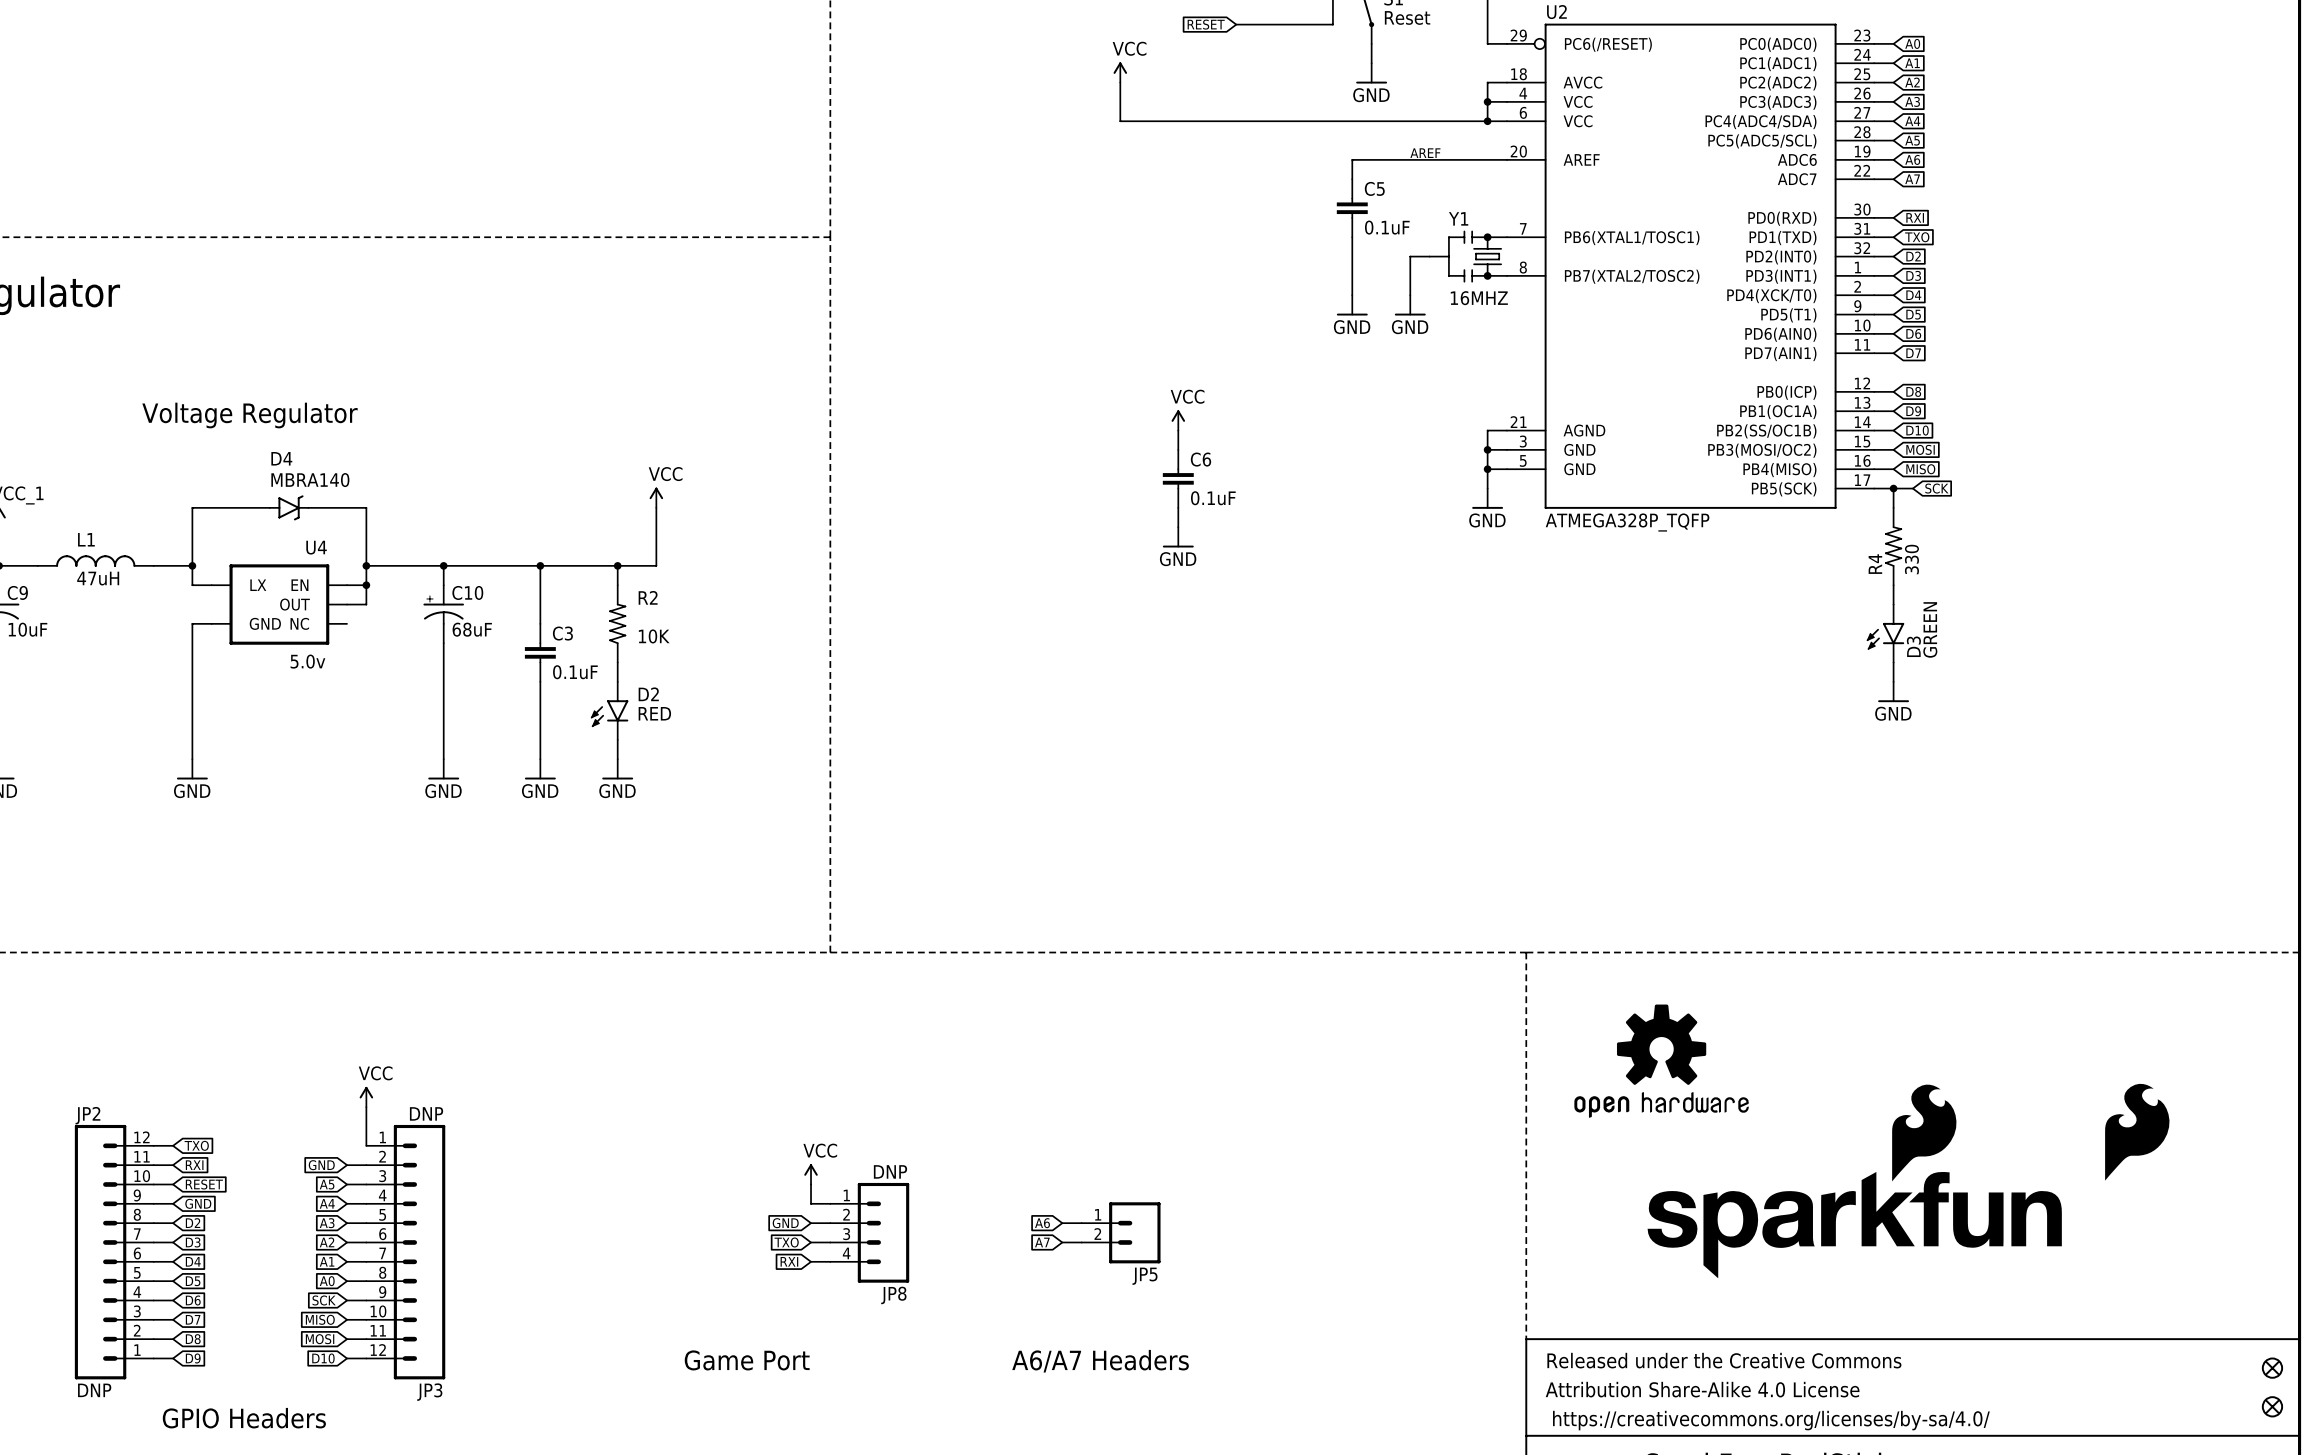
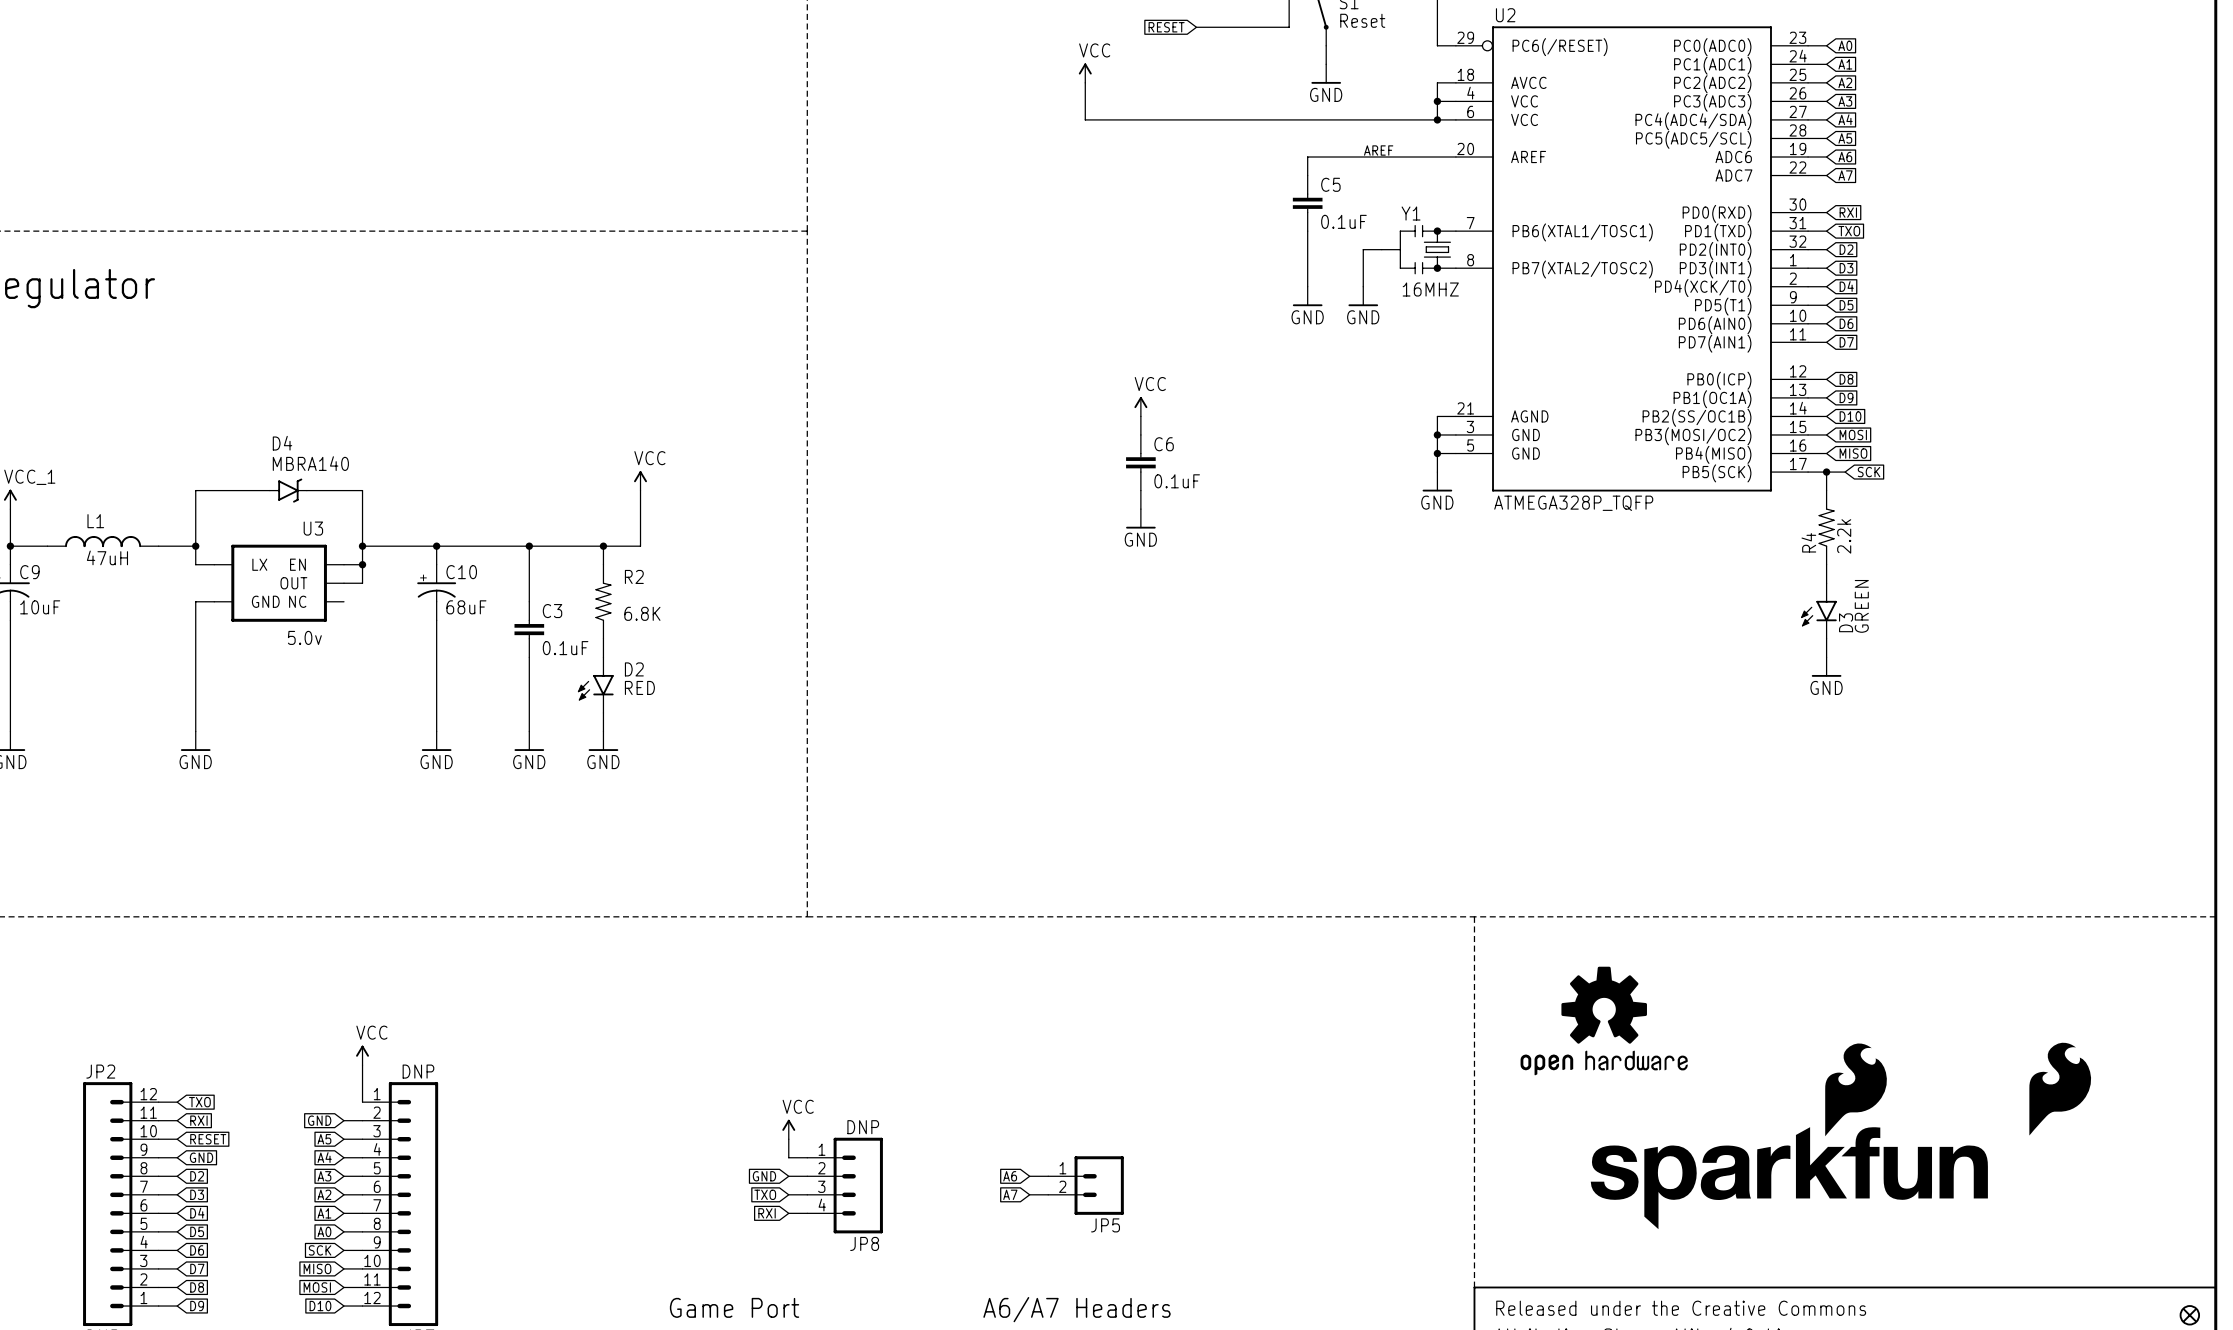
text: Voltage Regulator (249, 415) -> none
U4 name: U4 (316, 547) -> U3 (313, 528)
R4 value: 330 (1911, 559) -> 2.2k (1844, 536)
R2 value: 10K (654, 636) -> 6.8K (642, 613)

